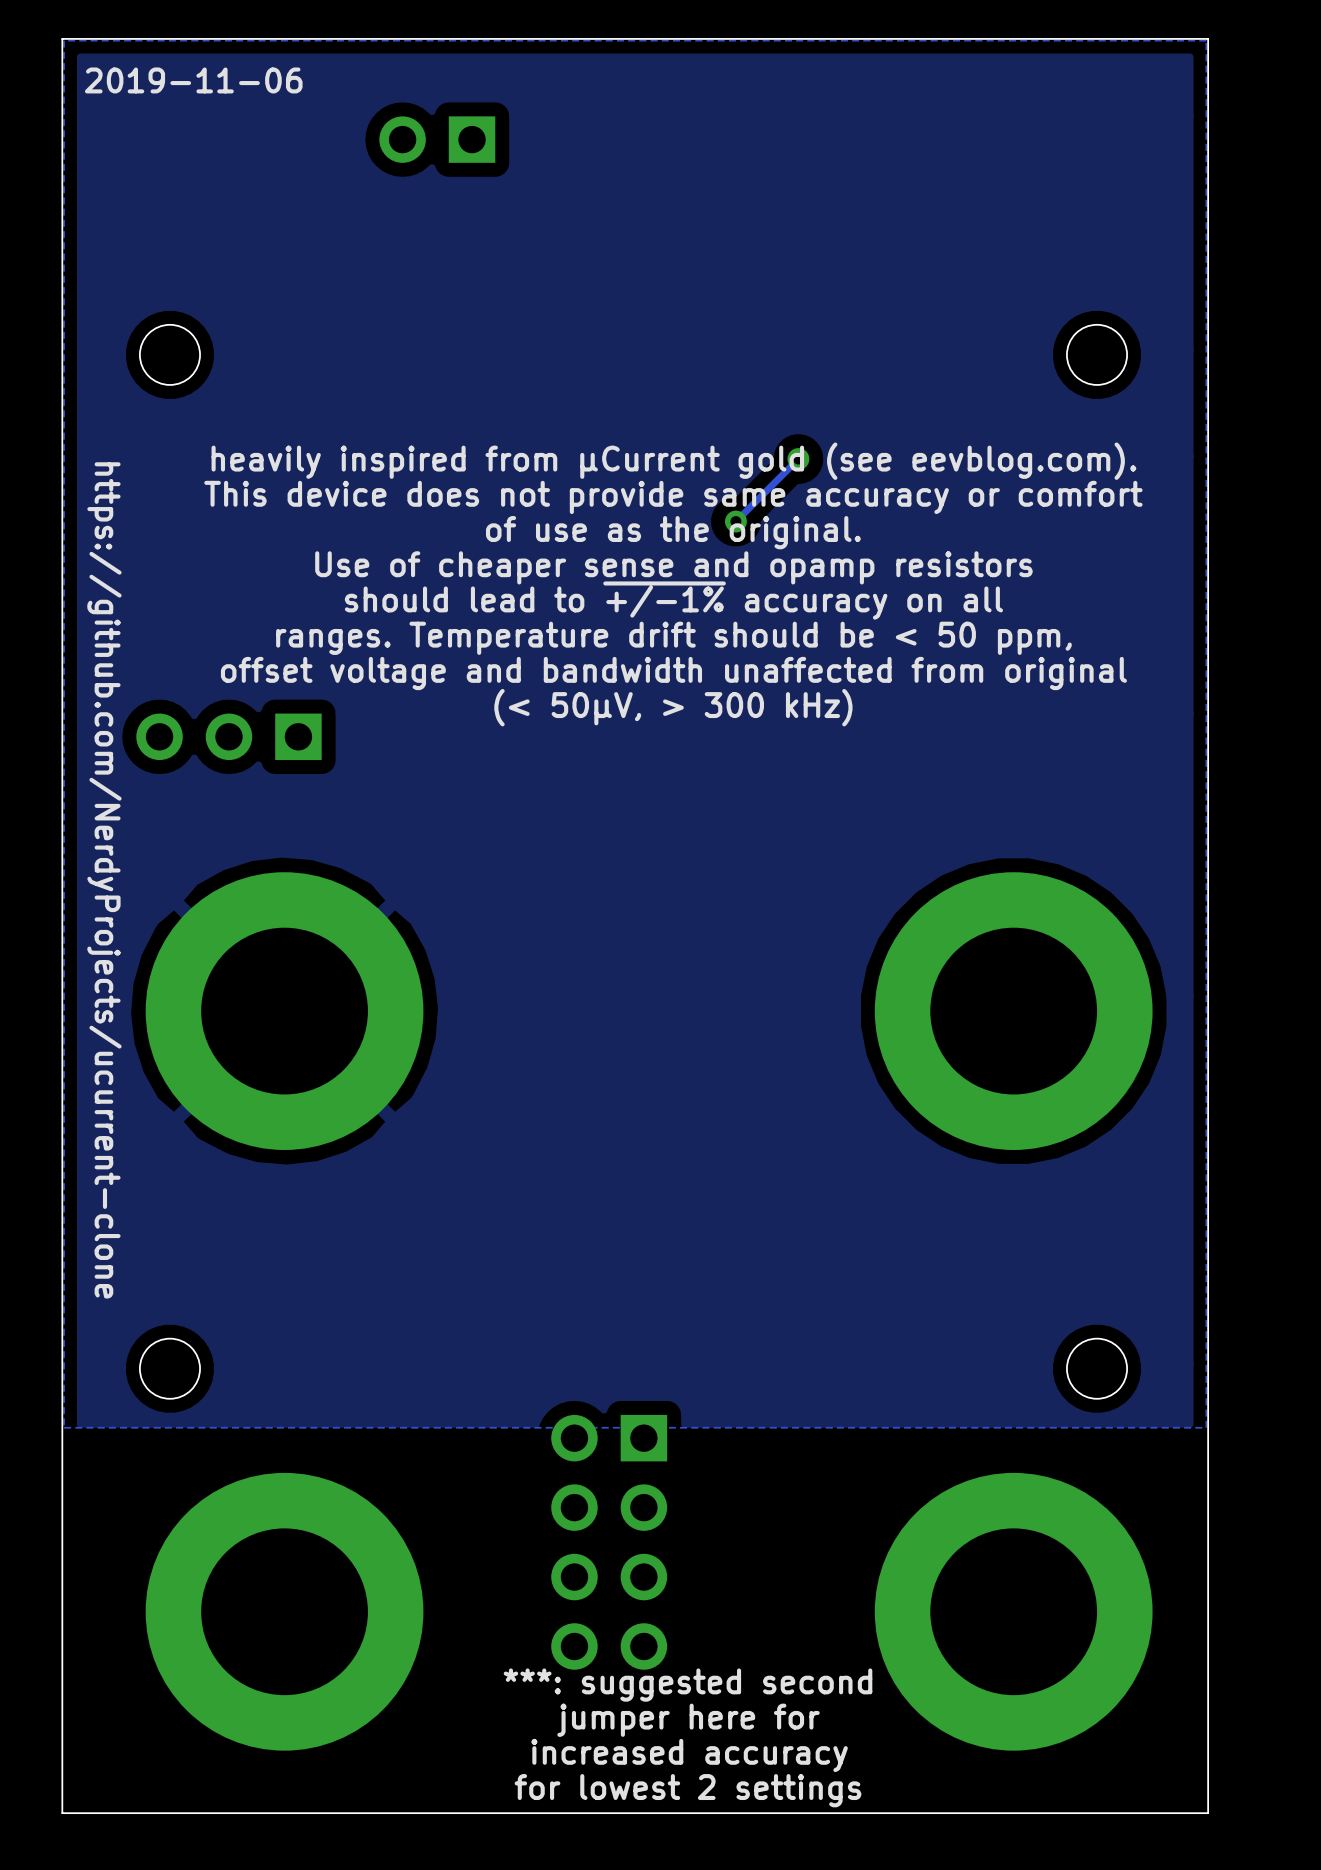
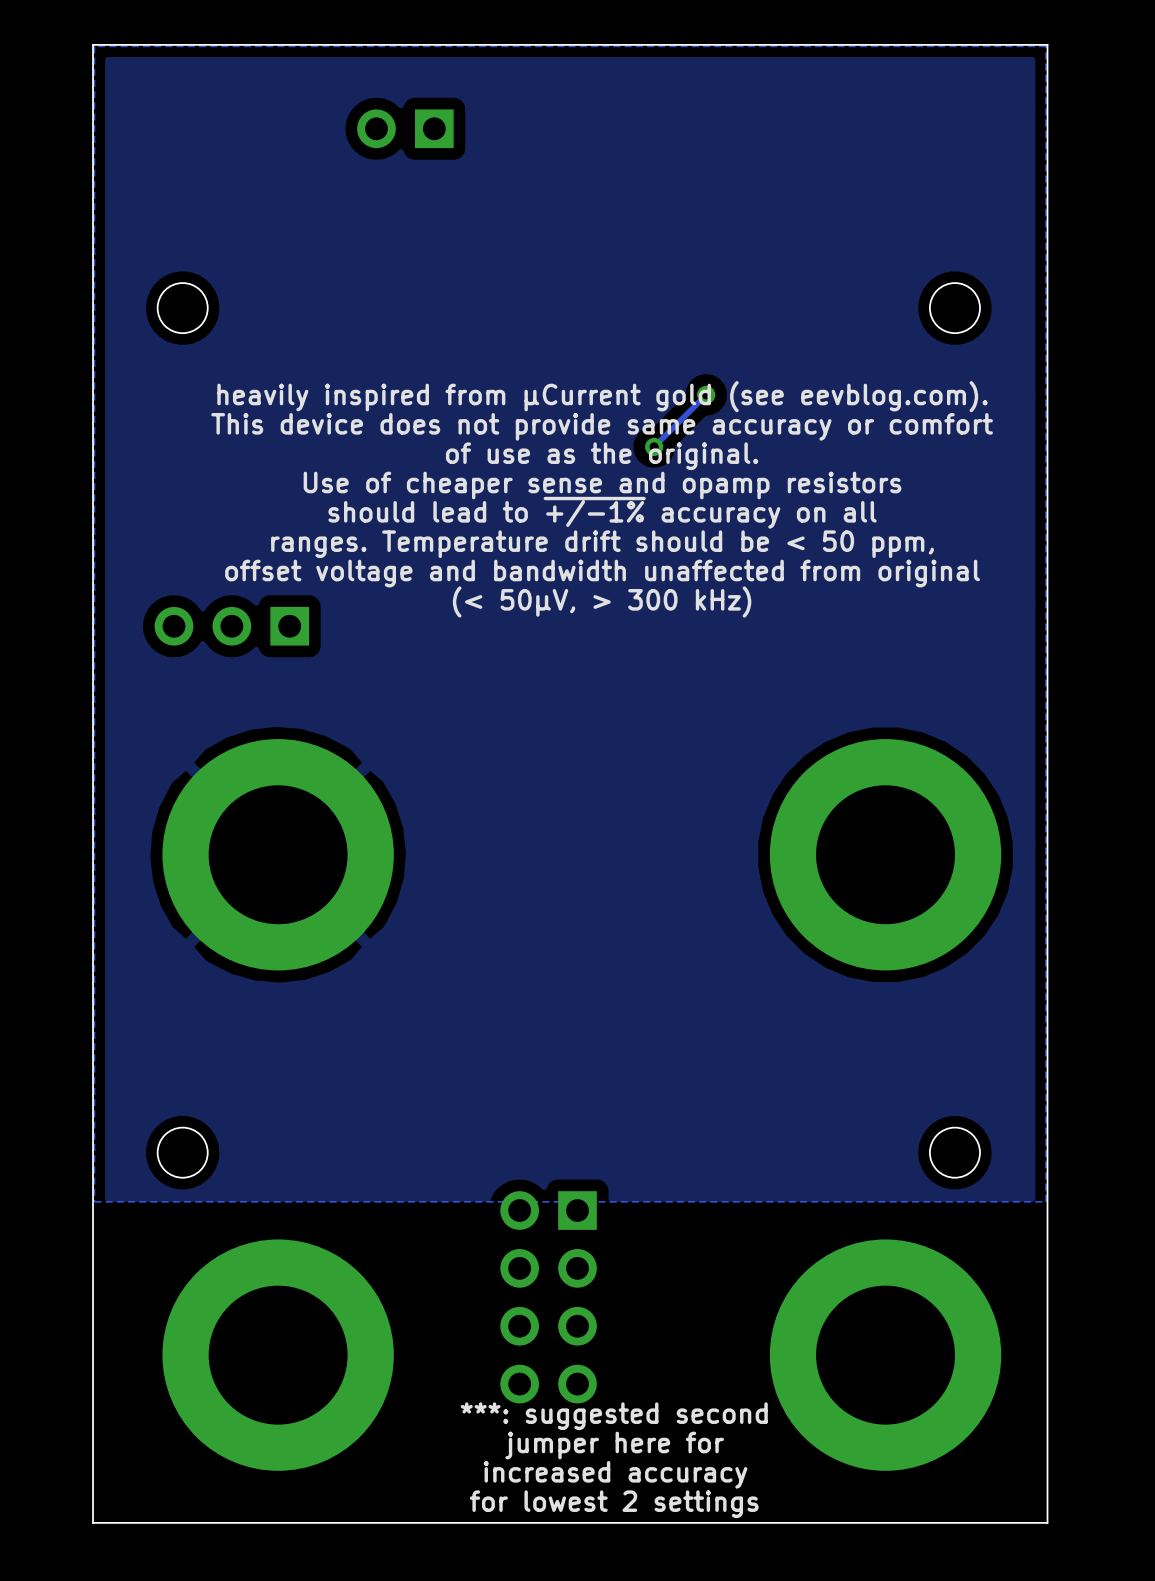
text: 2019-11-06 (193, 80) -> none
text: https://github.com/NerdyProjects/ucurrent-clone (104, 880) -> none

